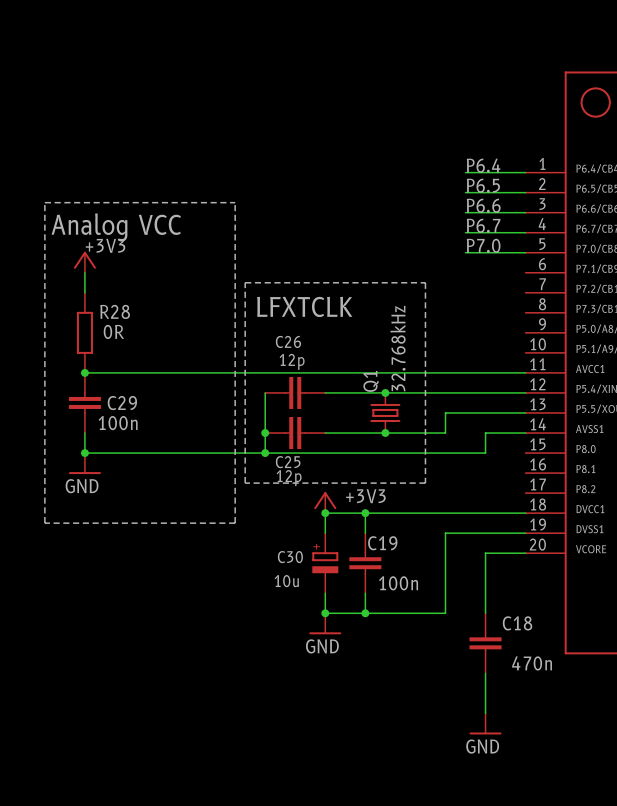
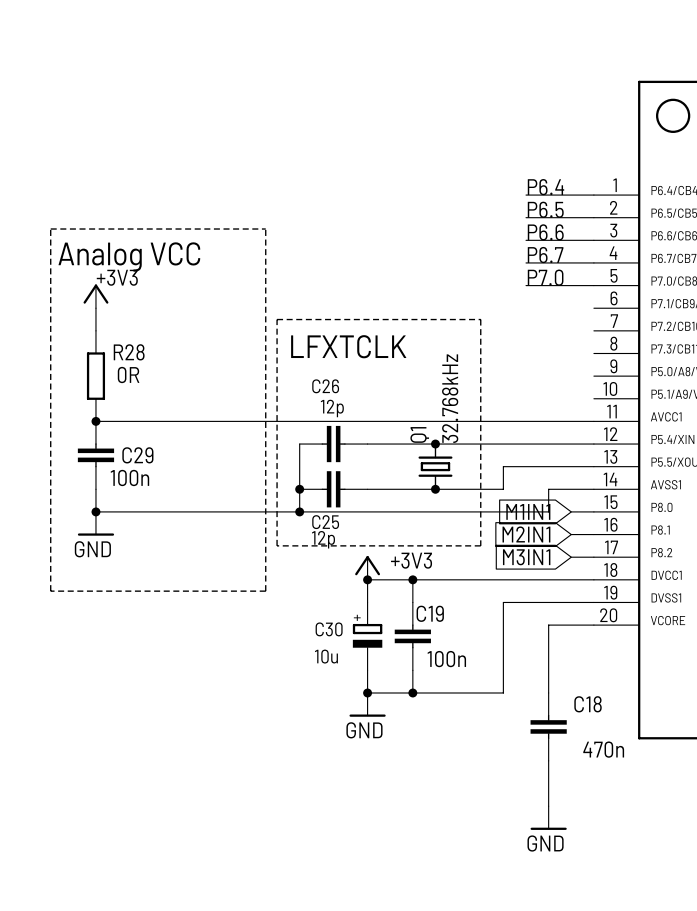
global label: none -> M1IN1 (528, 511)
wire: none -> (571, 511) (593, 511)
global label: none -> M2IN1 (526, 534)
wire: none -> (571, 534) (593, 534)
global label: none -> M3IN1 (526, 557)
wire: none -> (571, 557) (593, 557)

